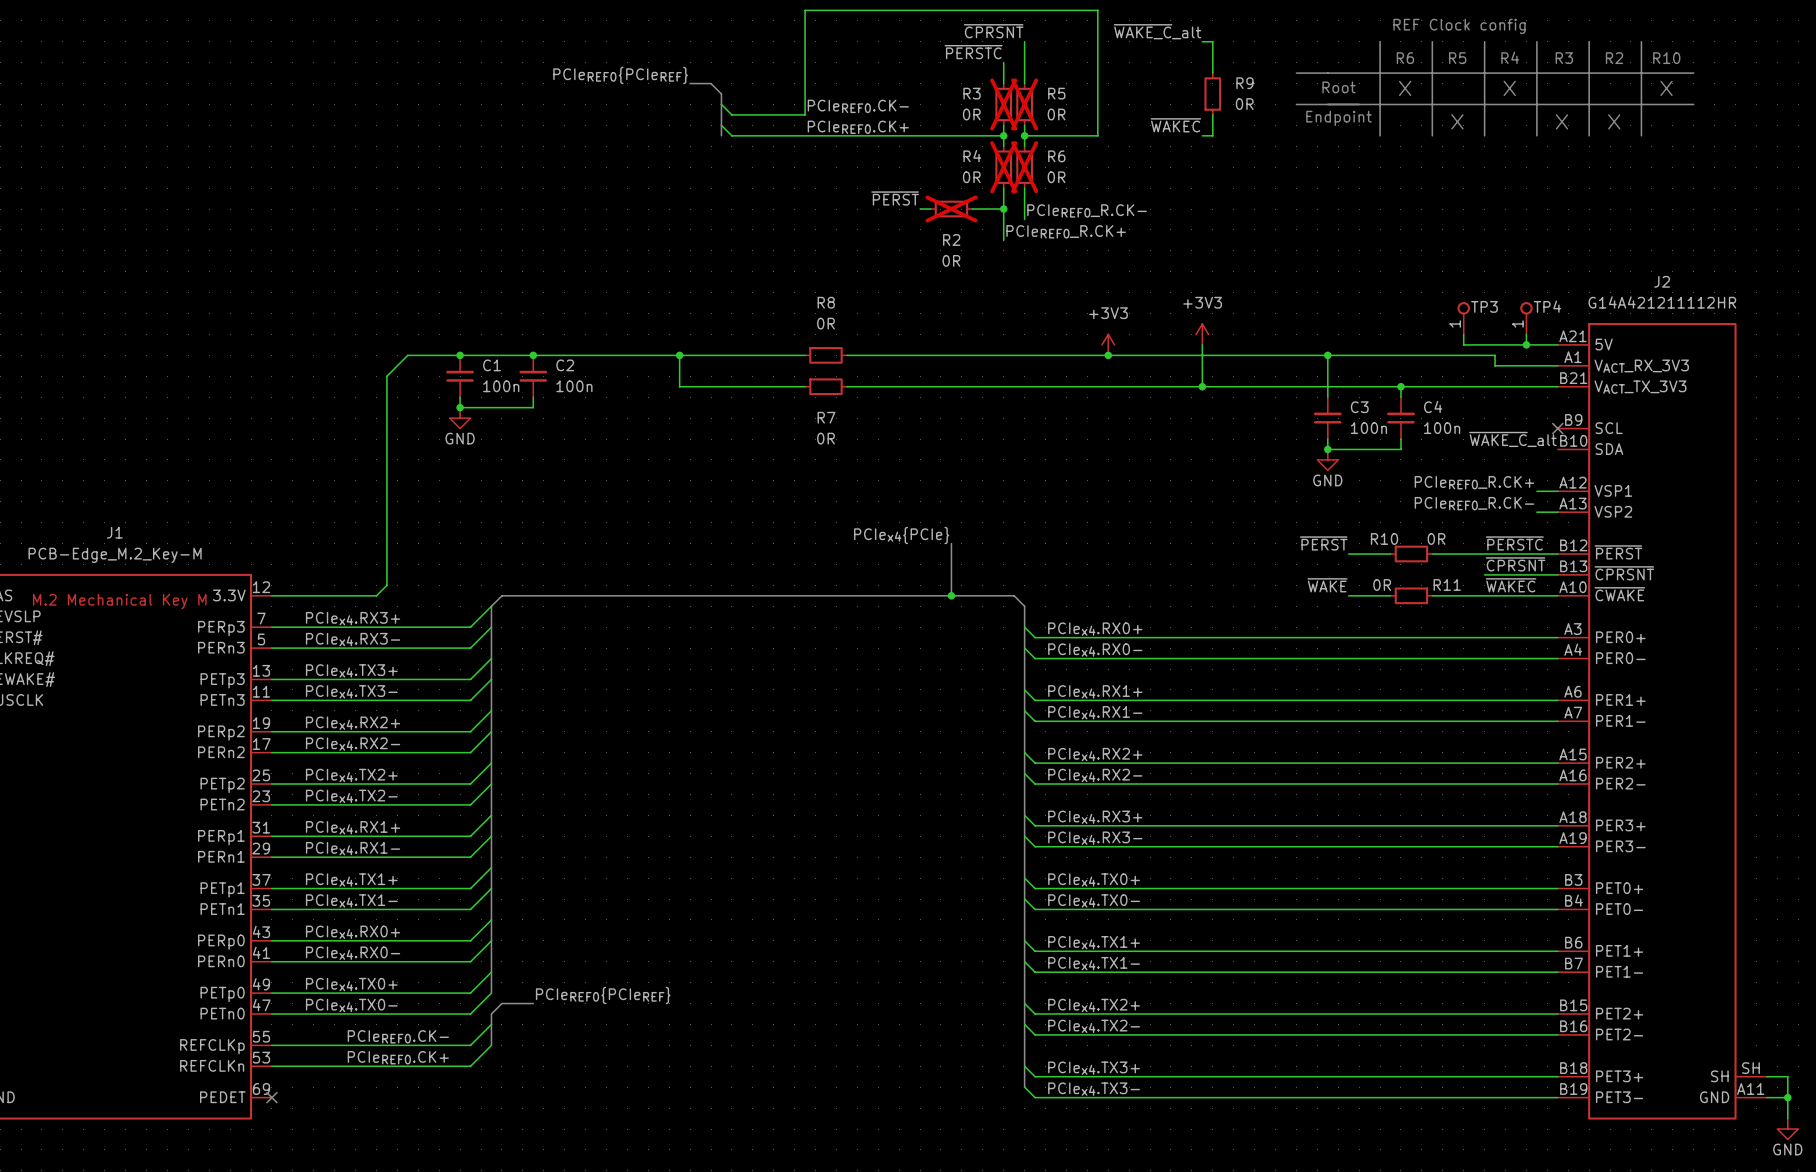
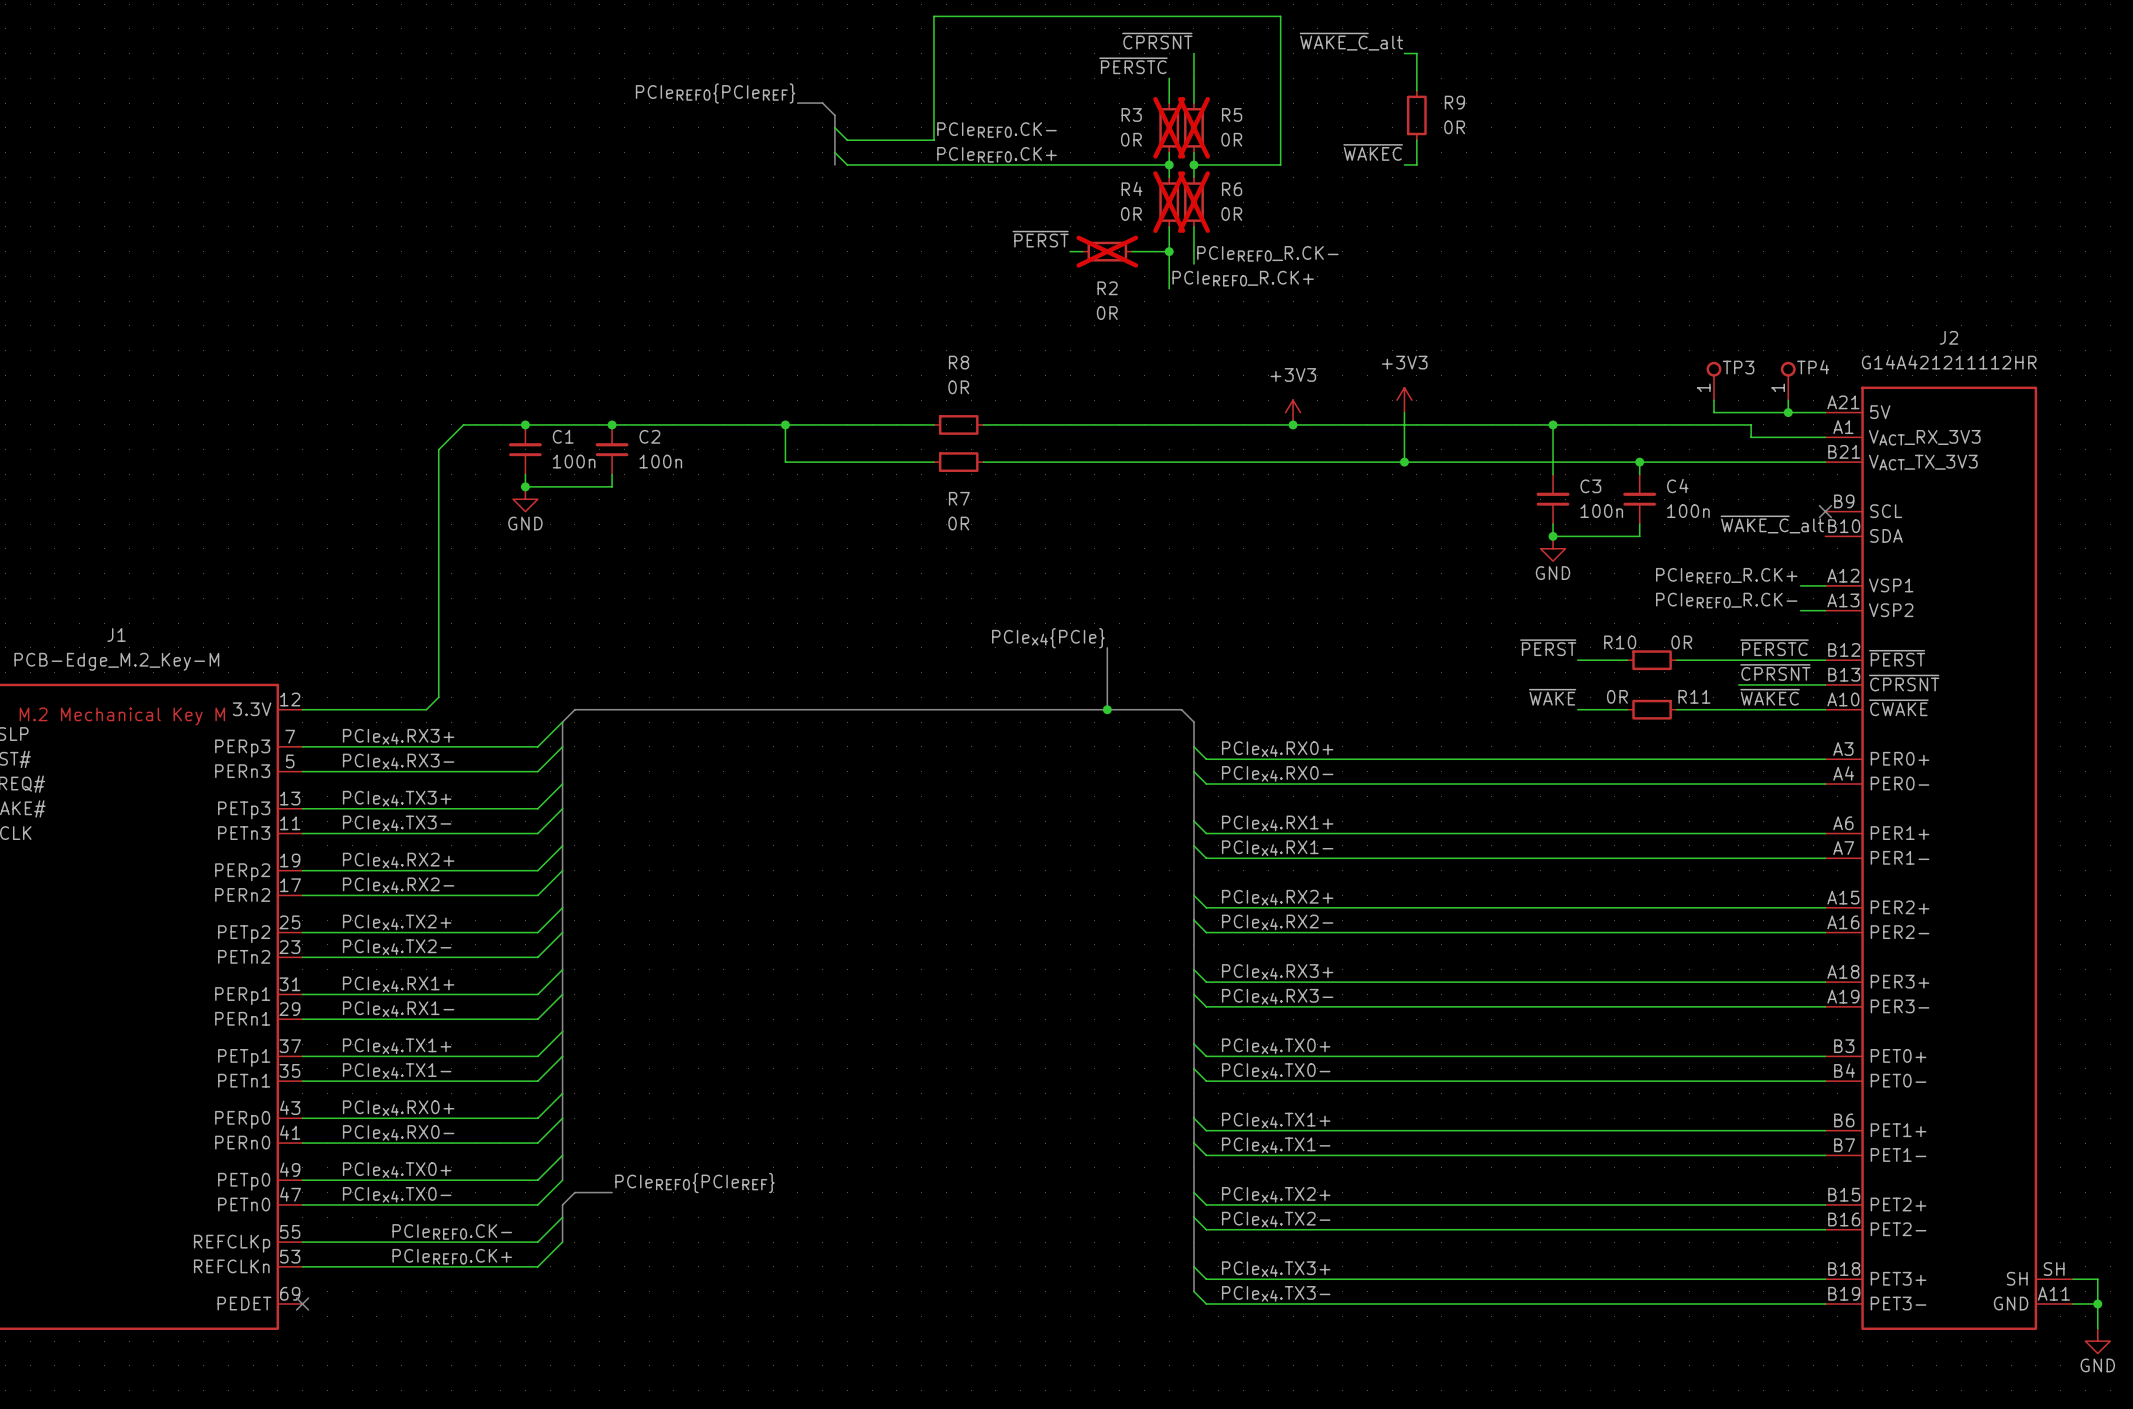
text: REF Clock config (1459, 26) -> none
line: (1380, 41) (1380, 135) -> none
line: (1432, 41) (1432, 135) -> none
line: (1484, 41) (1484, 135) -> none
line: (1536, 41) (1536, 135) -> none
line: (1589, 41) (1589, 135) -> none
line: (1641, 41) (1641, 135) -> none
text: R4 (1510, 57) -> none
text: R6 (1405, 58) -> none
text: R5 (1457, 58) -> none
text: R3 (1564, 58) -> none
text: R2 (1614, 58) -> none
text: R10 (1666, 58) -> none
line: (1296, 73) (1693, 73) -> none
text: Root (1339, 87) -> none
text: x (1405, 88) -> none
text: x (1509, 88) -> none
text: x (1666, 88) -> none
line: (1296, 104) (1693, 104) -> none
text: Endpoint (1339, 118) -> none
text: x (1457, 121) -> none
text: x (1561, 121) -> none
text: x (1614, 121) -> none

